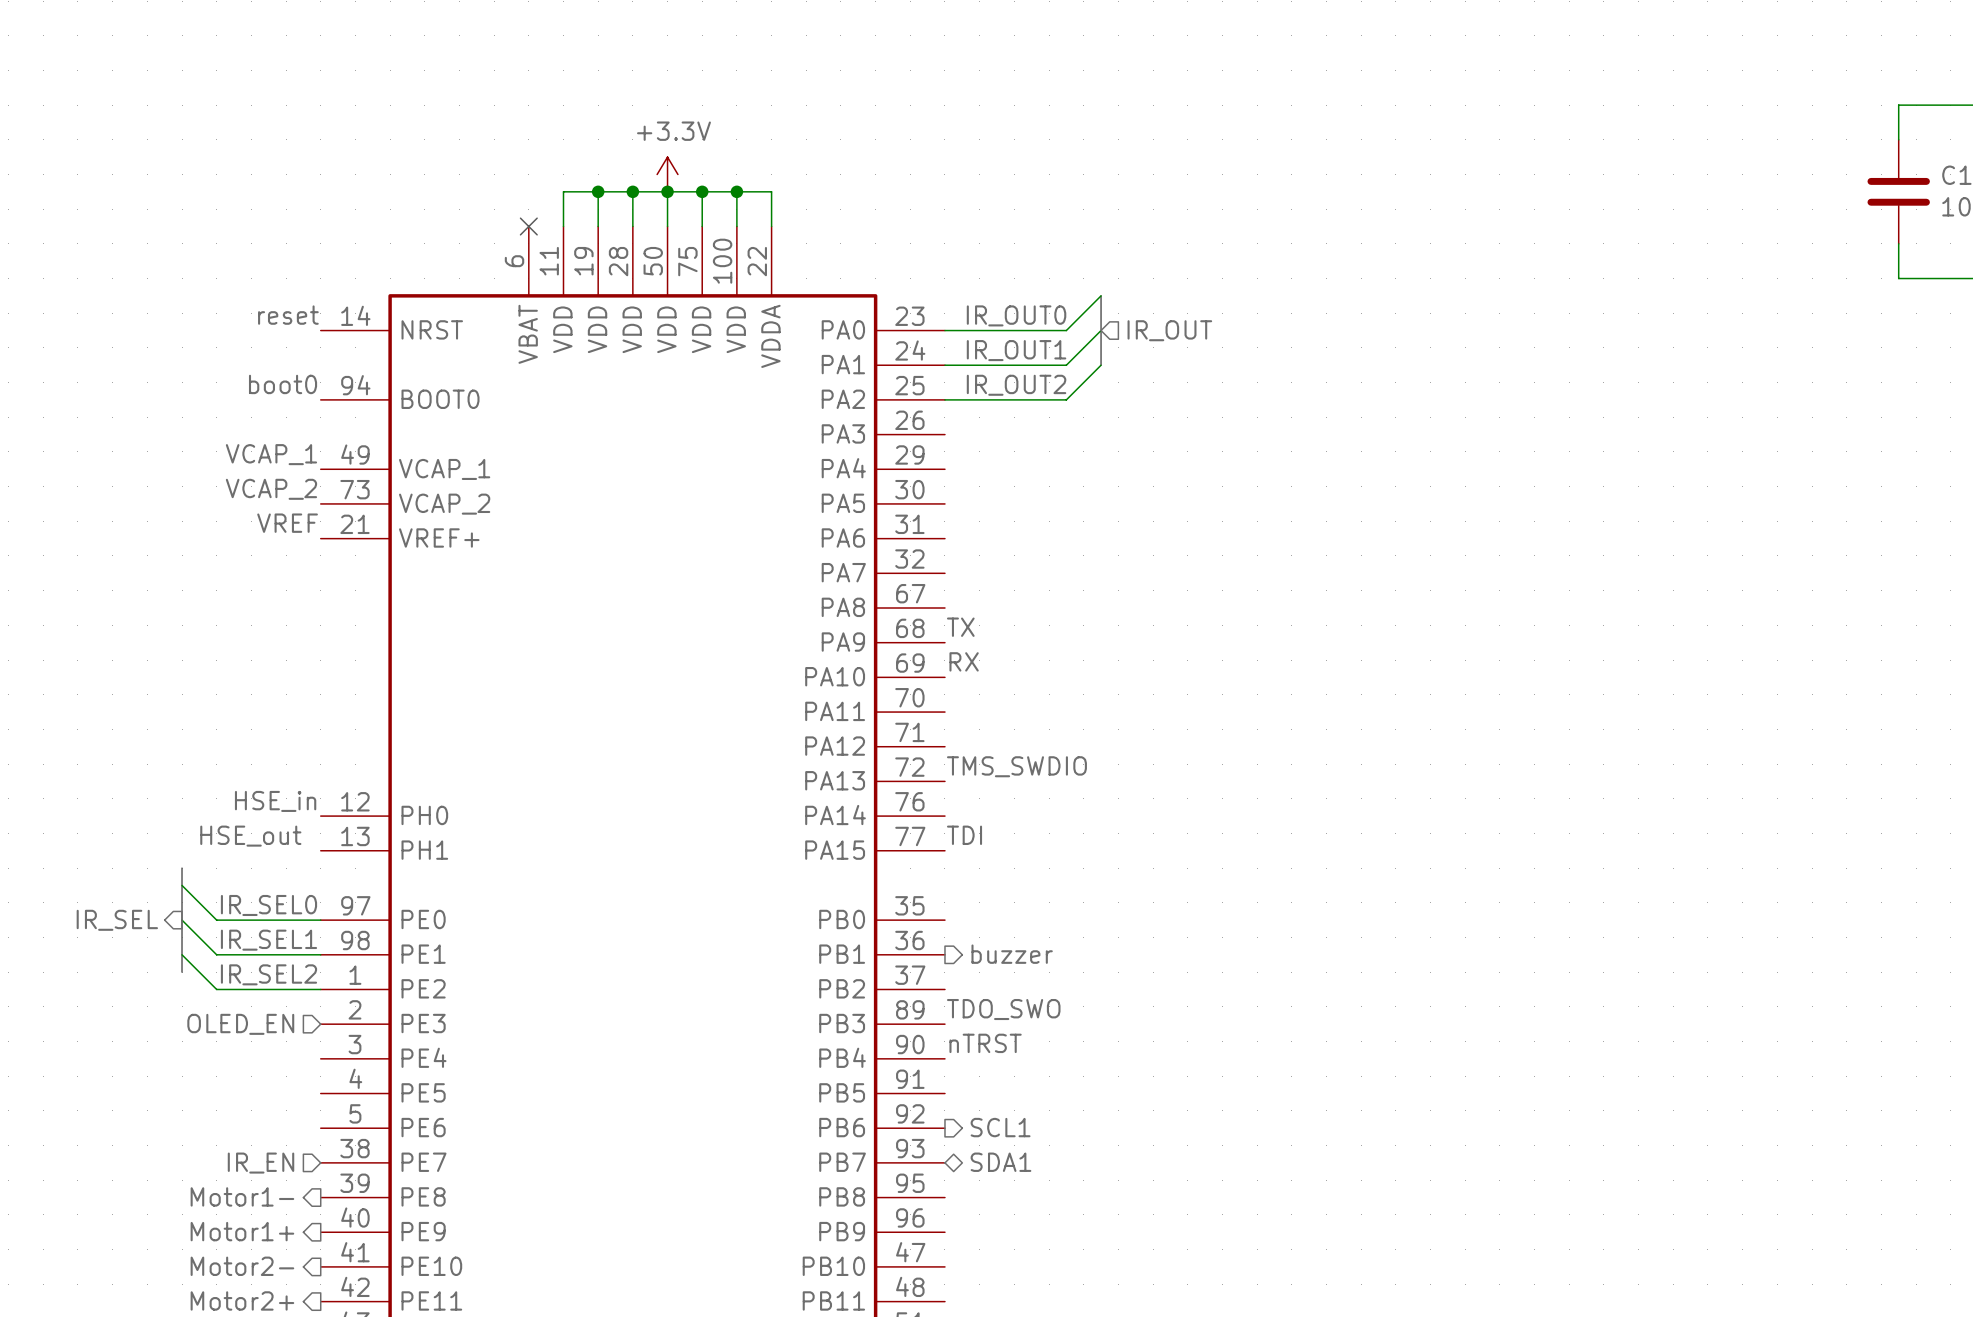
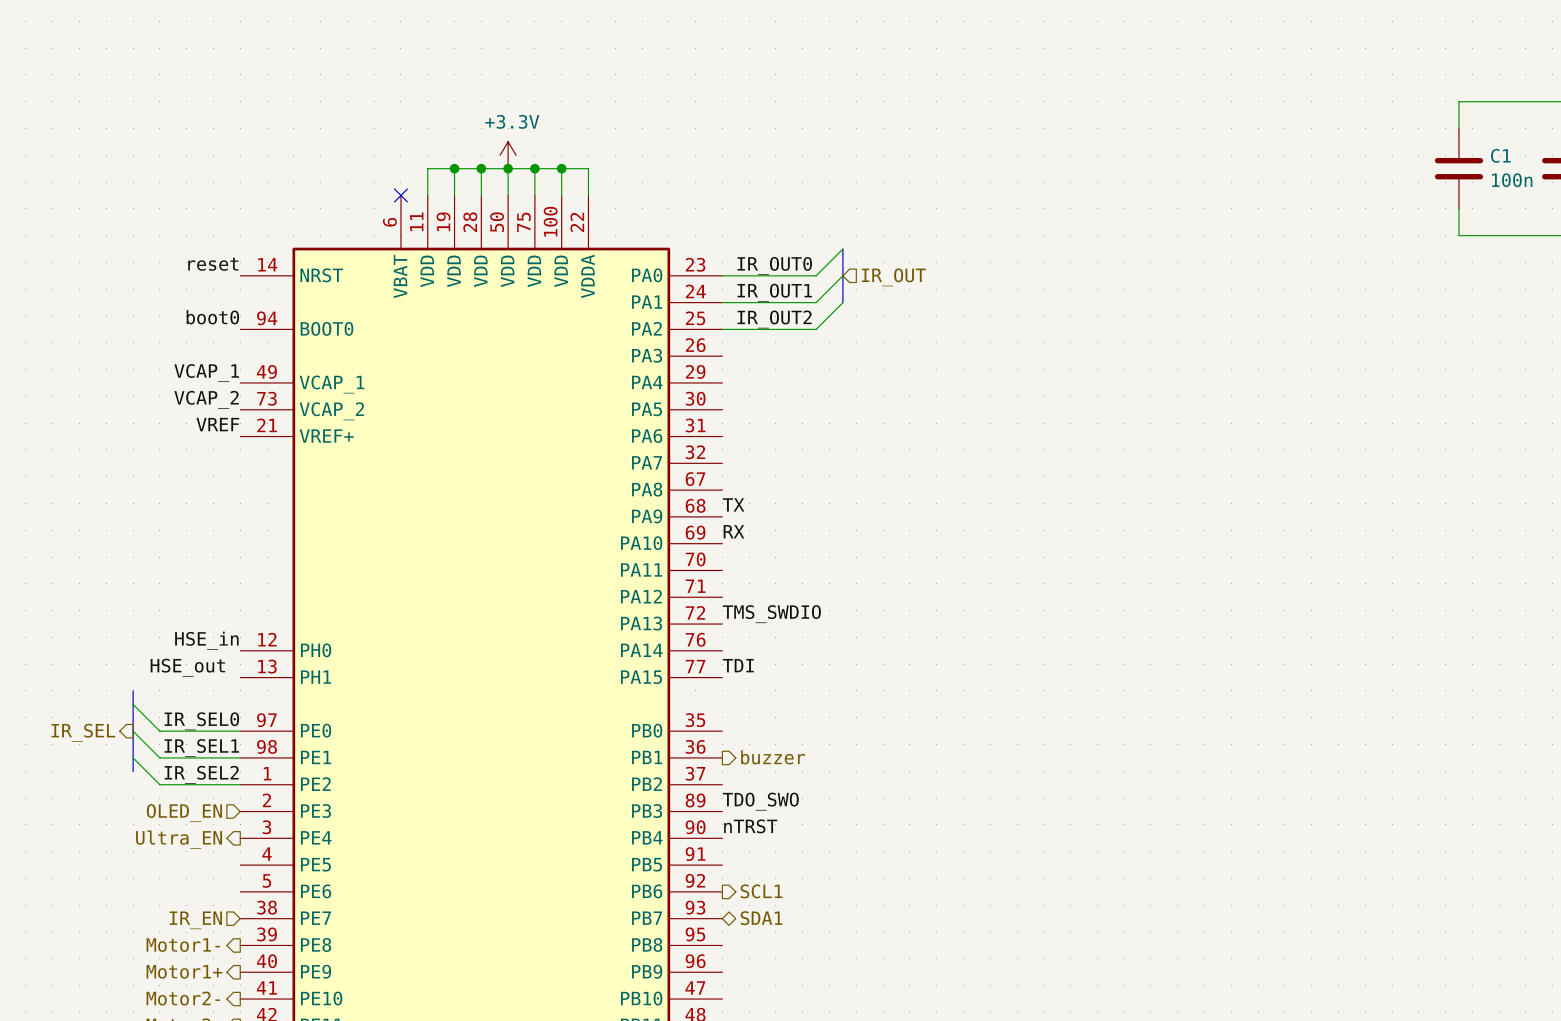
hierarchical label: none -> Ultra_EN (179, 839)

